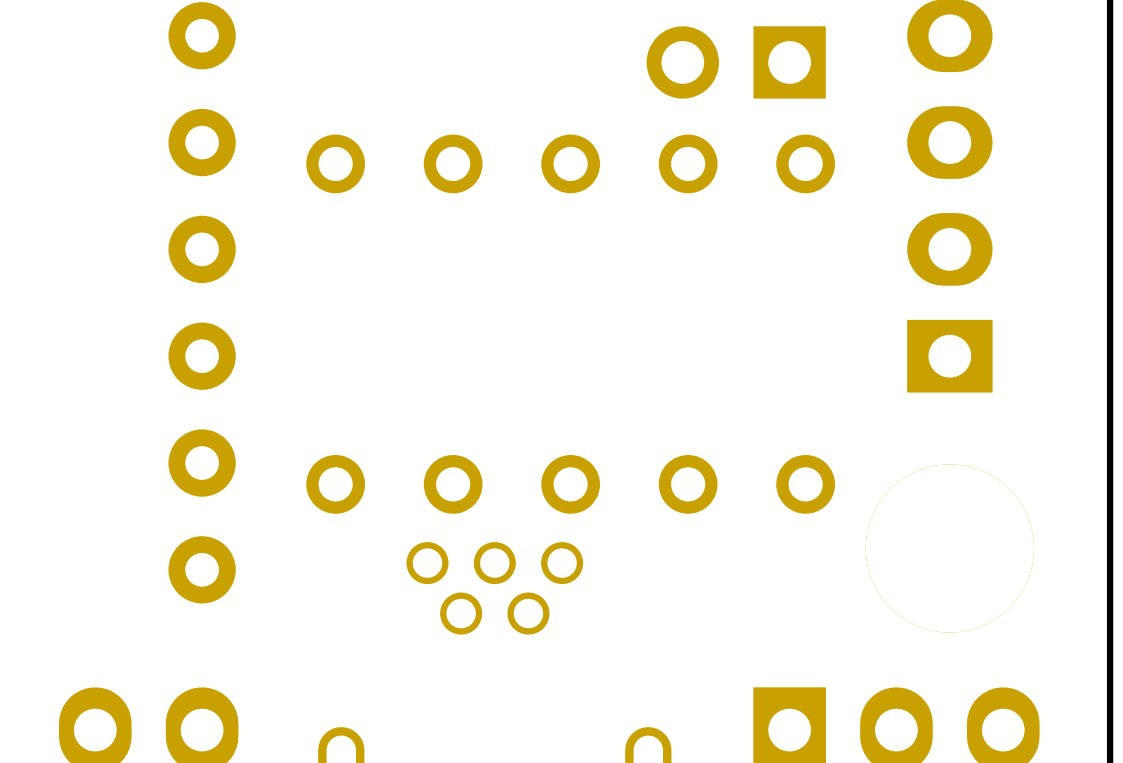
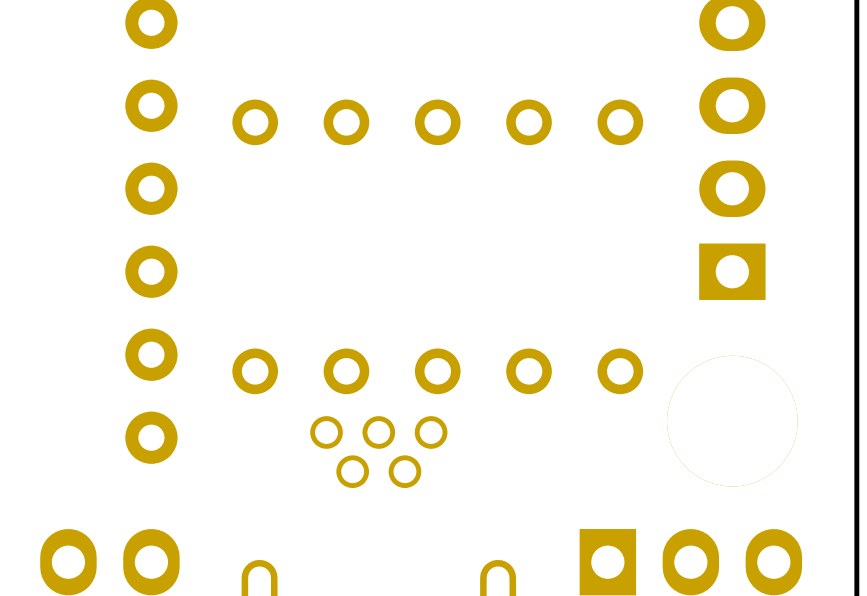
part: (736, 62) -> none

